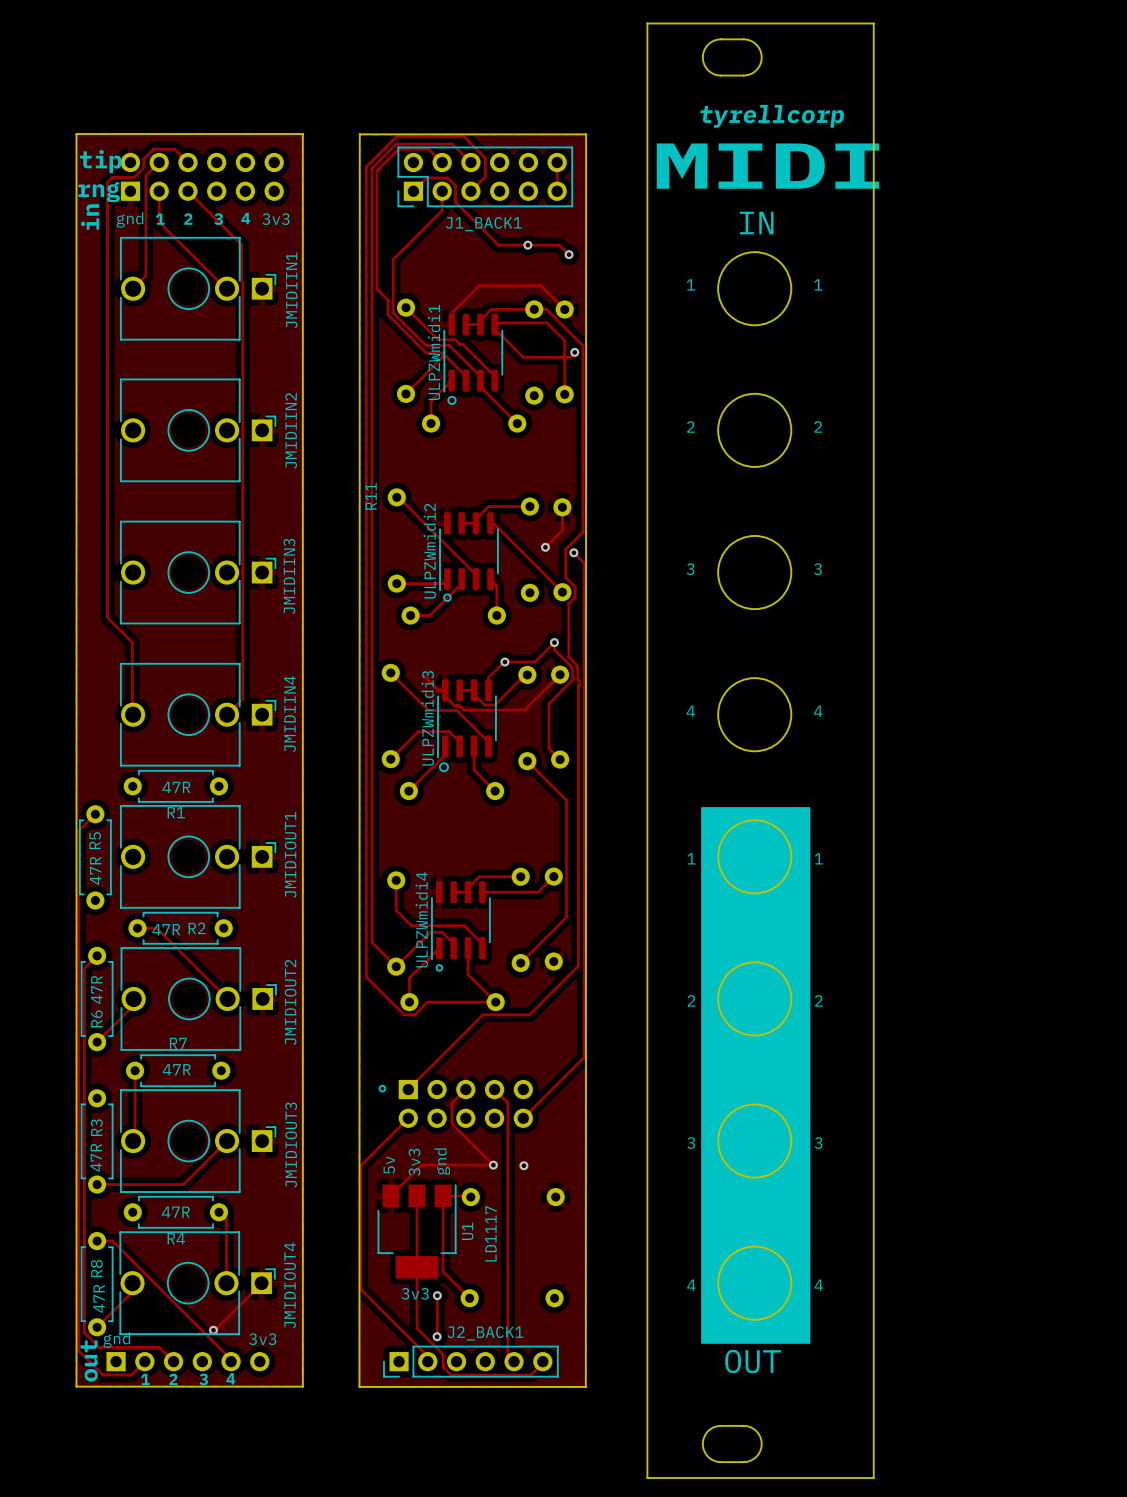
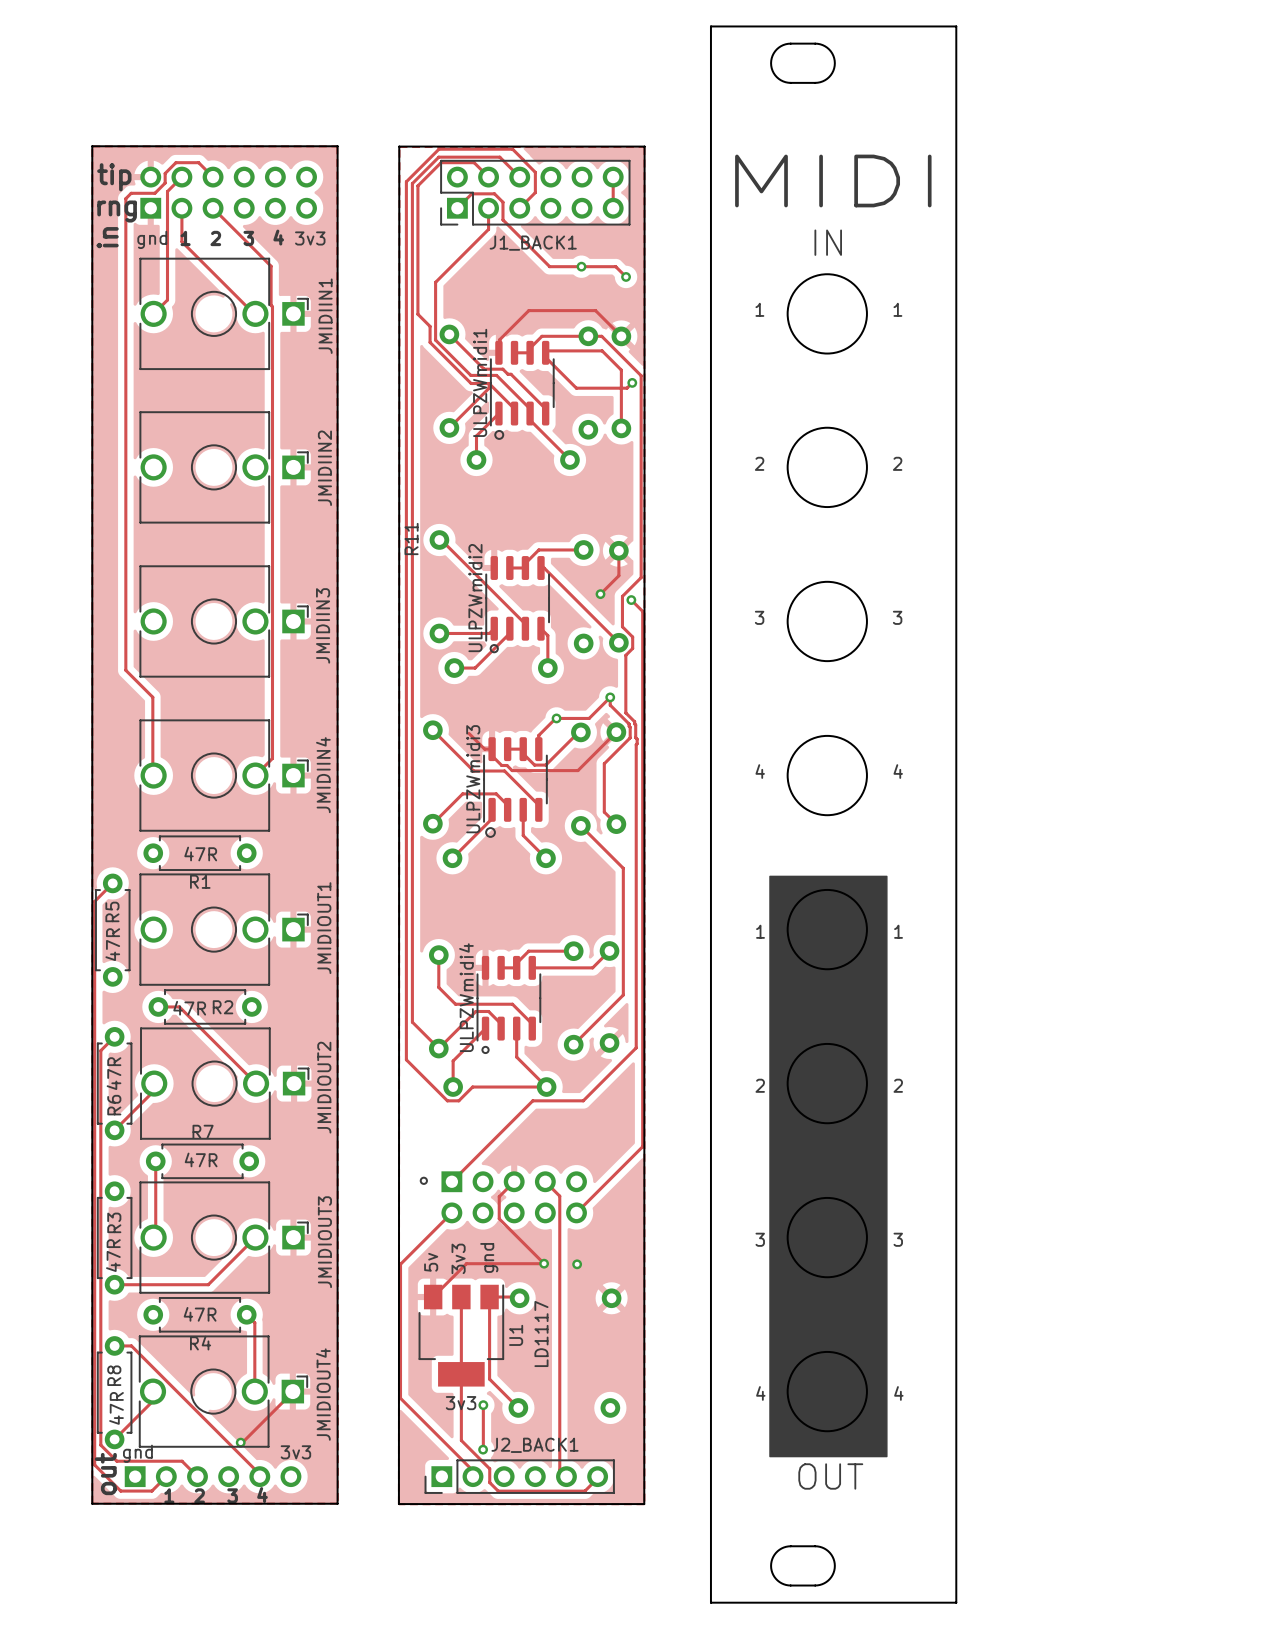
text: tyrellcorp (772, 116) -> none

